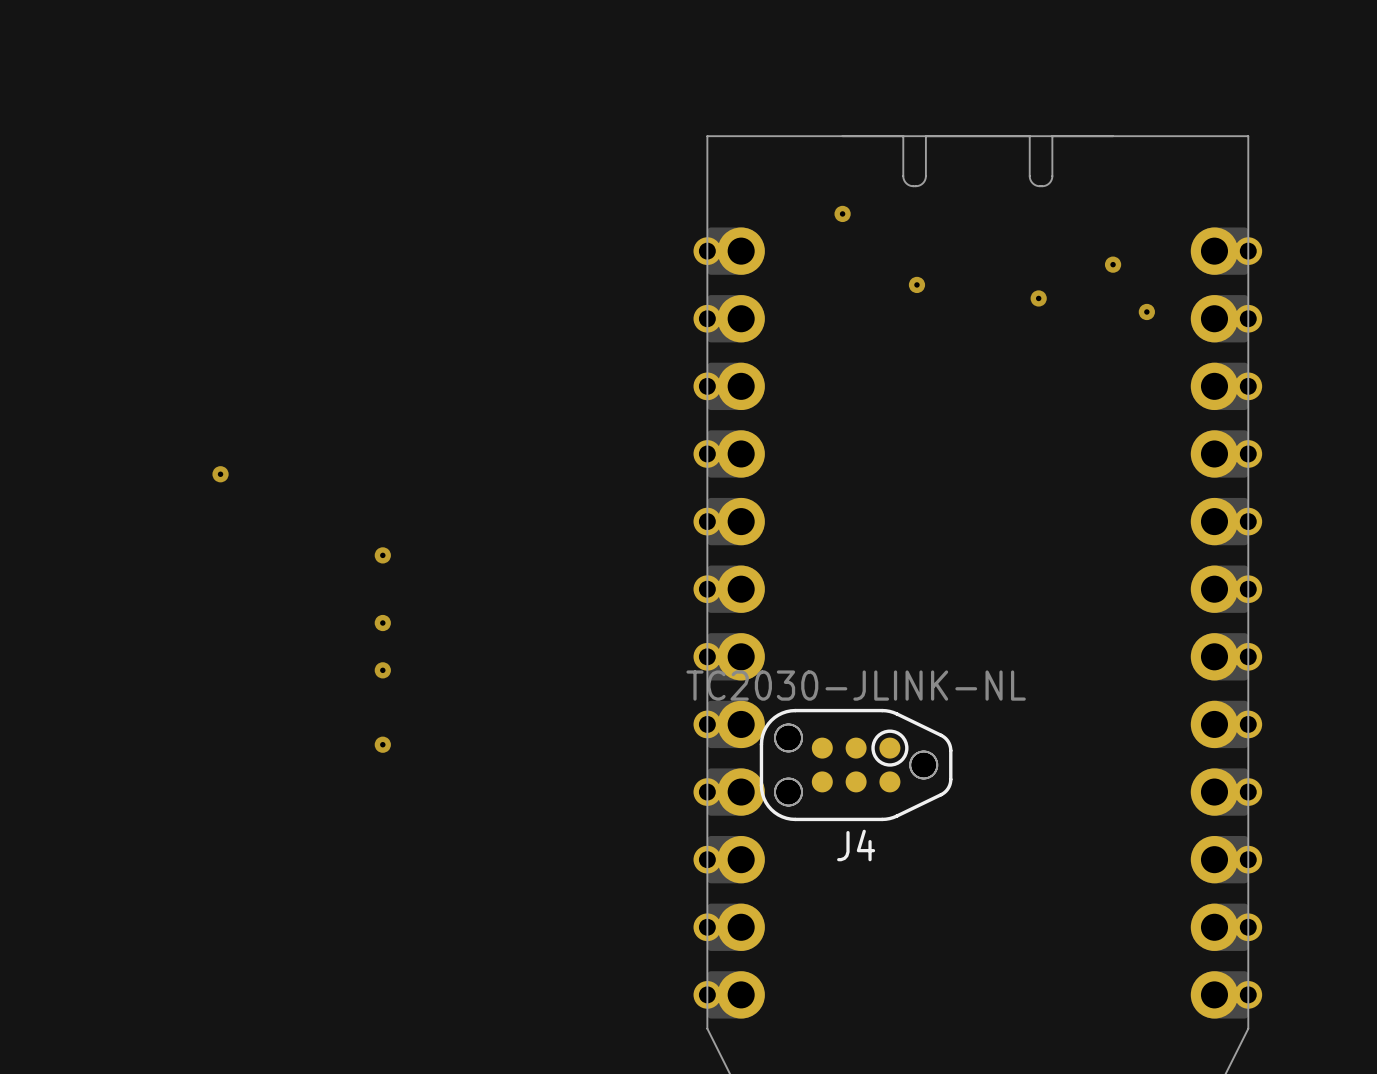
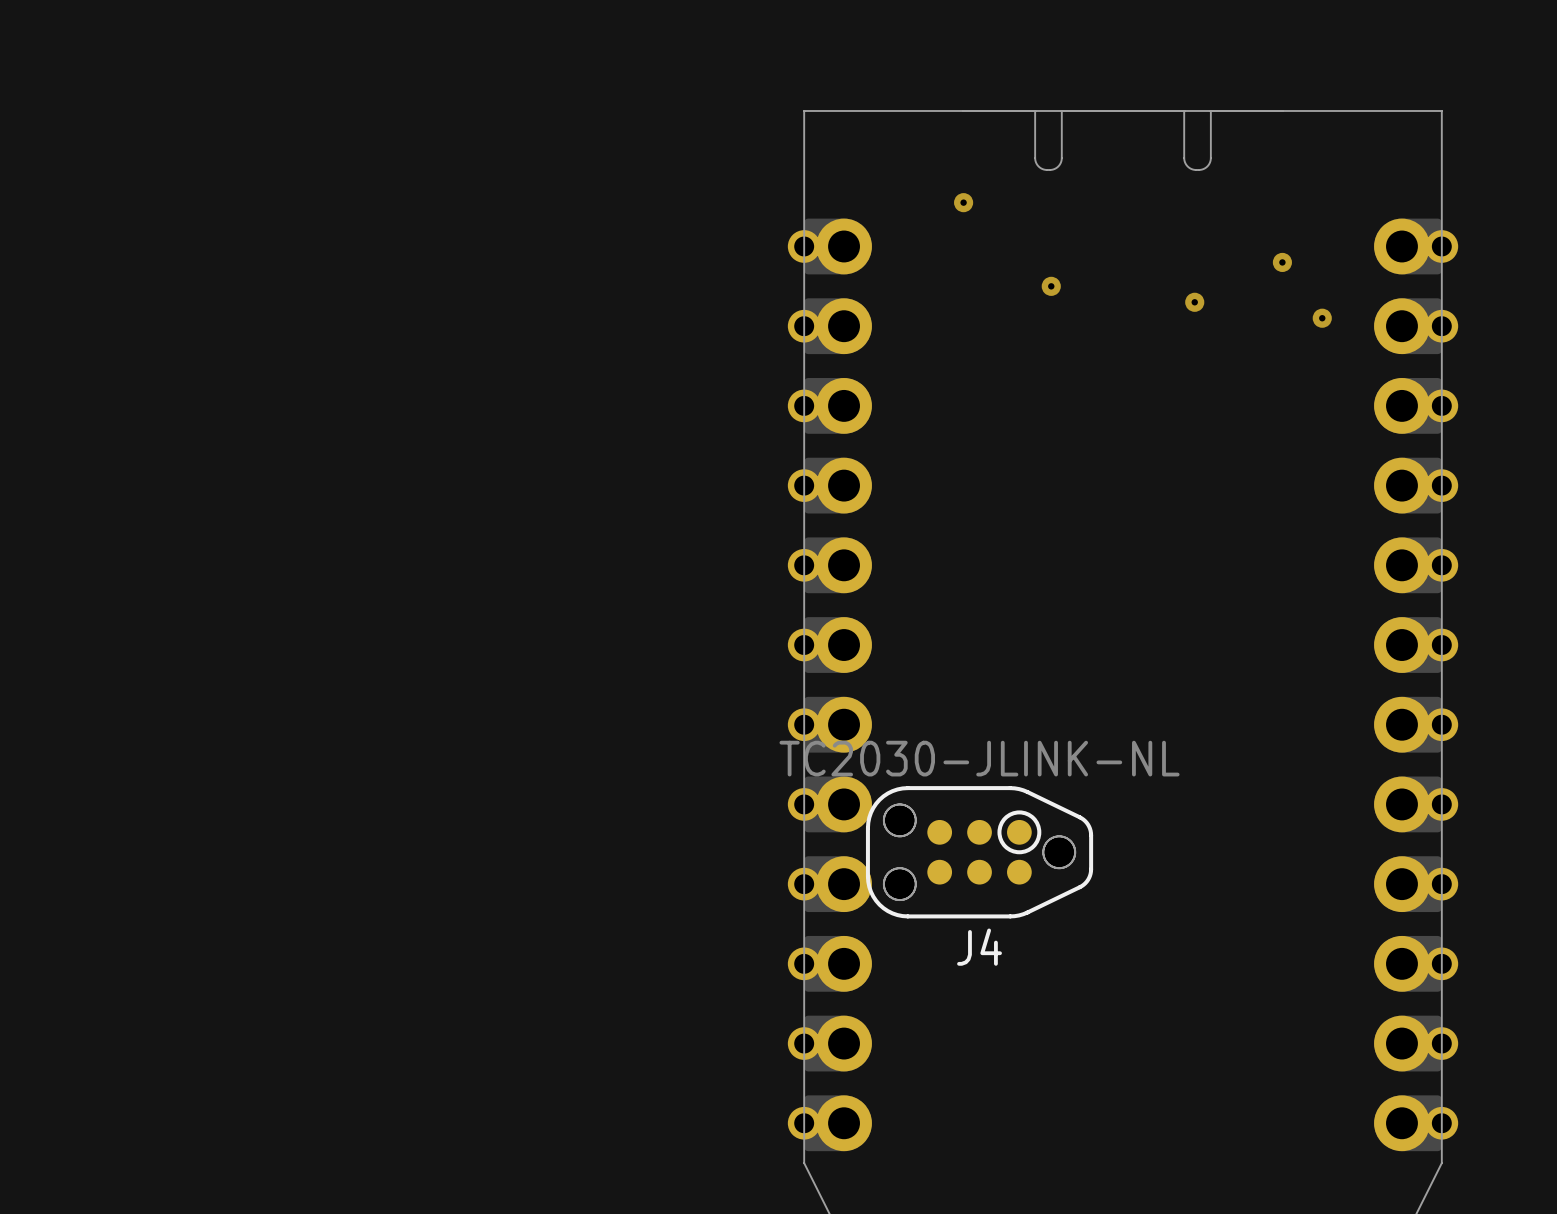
via: (220, 474) -> none
via: (382, 555) -> none
via: (382, 623) -> none
via: (382, 670) -> none
via: (382, 744) -> none

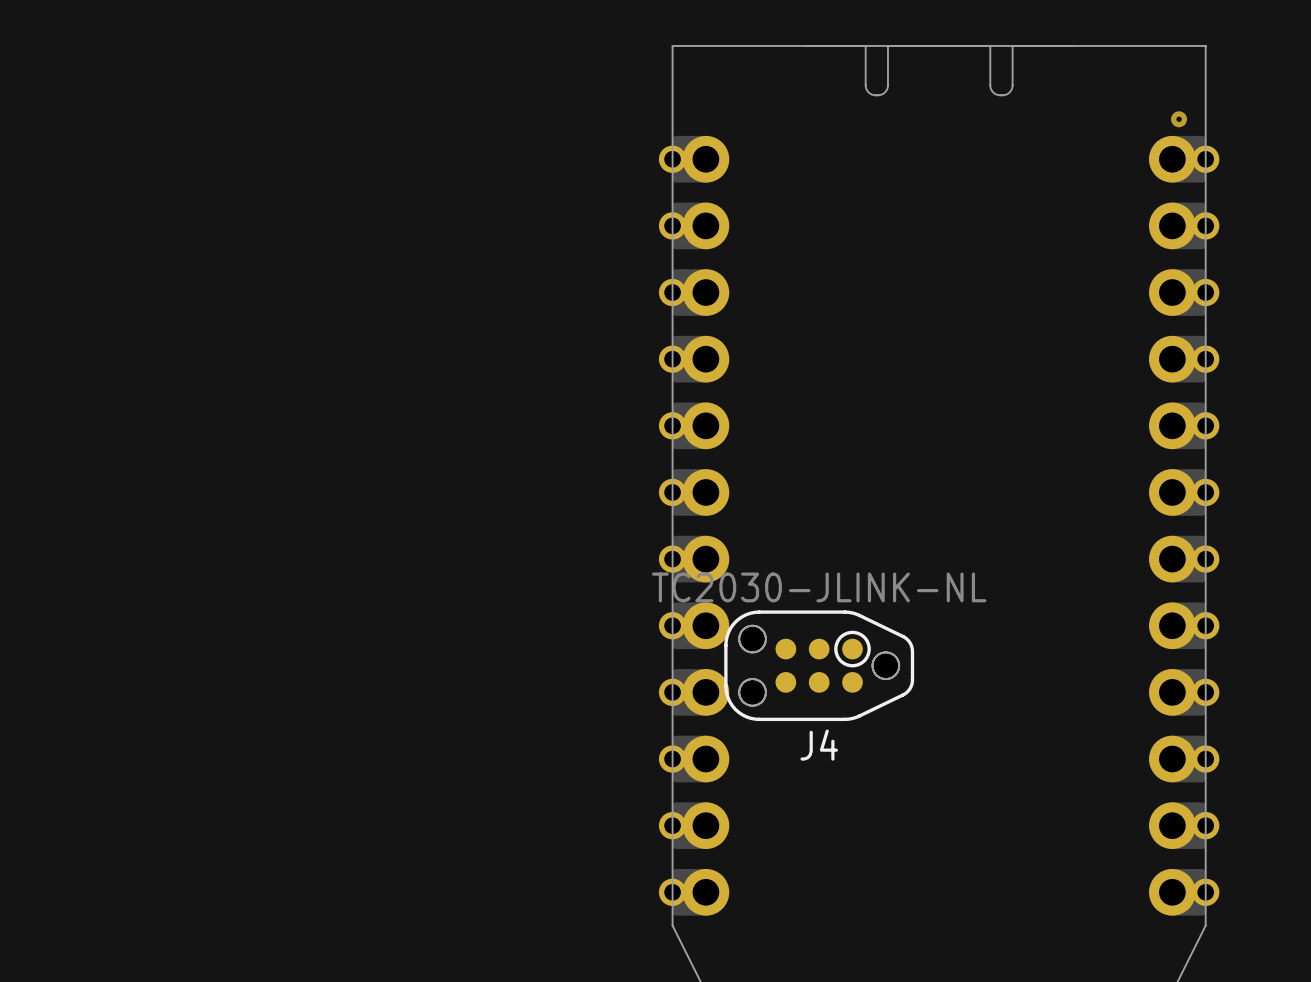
via: none -> (1179, 119)
via: (963, 202) -> none
via: (1282, 262) -> none
via: (1051, 286) -> none
via: (1194, 302) -> none
via: (1322, 318) -> none

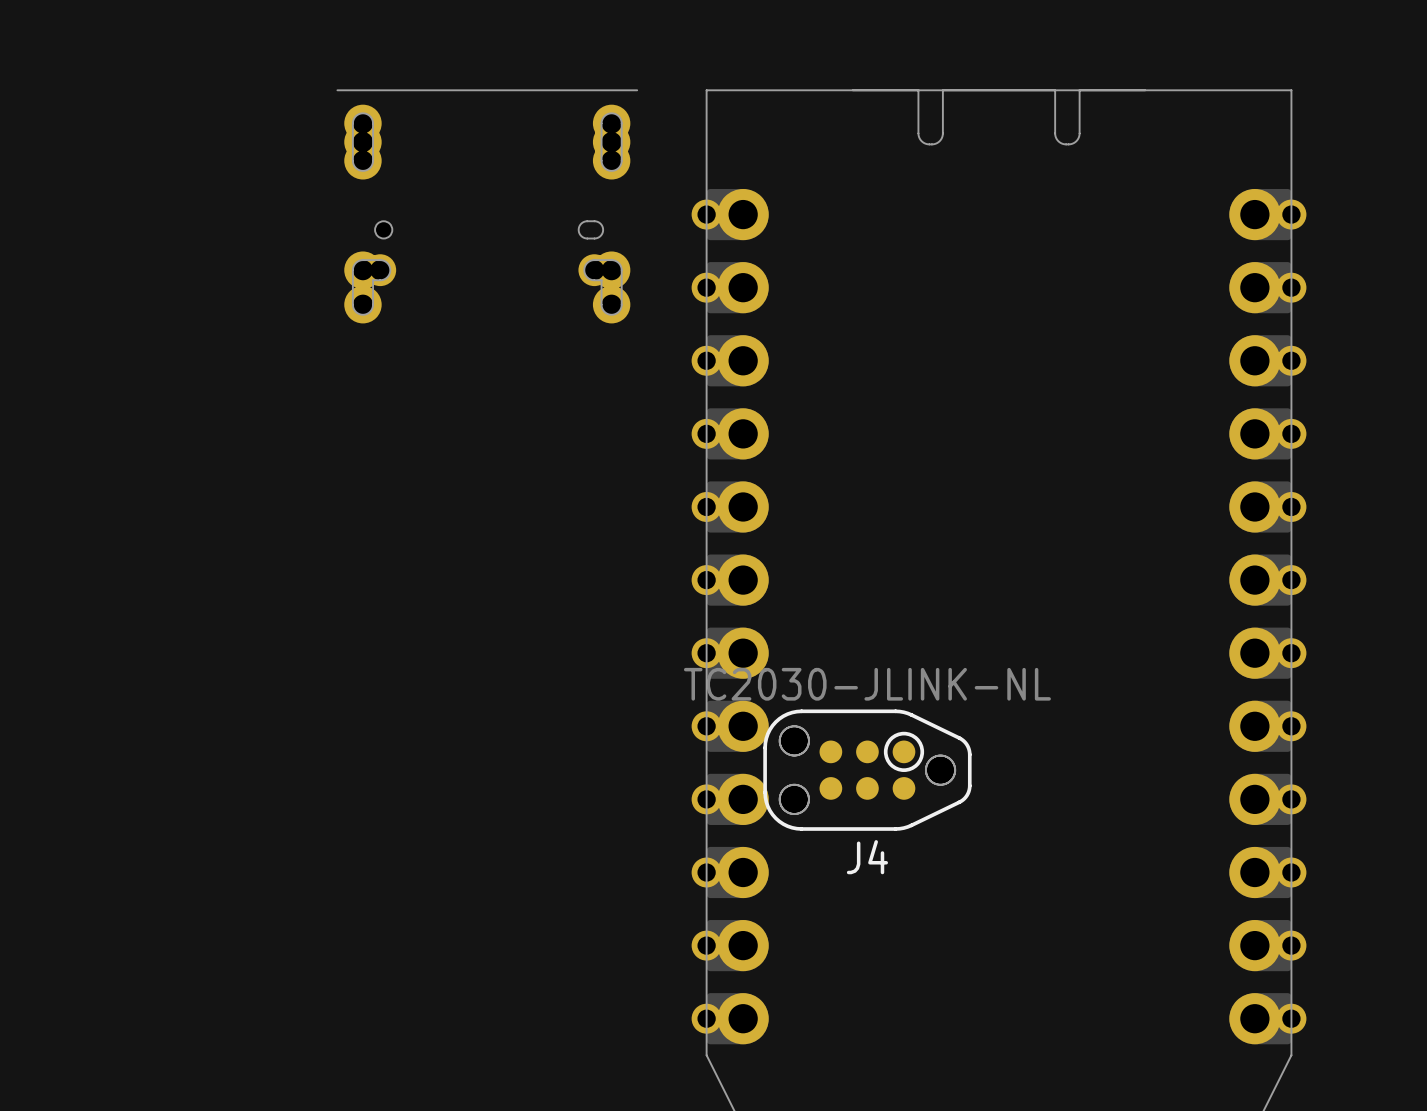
via: (1179, 119) -> none
part: none -> (487, 206)

